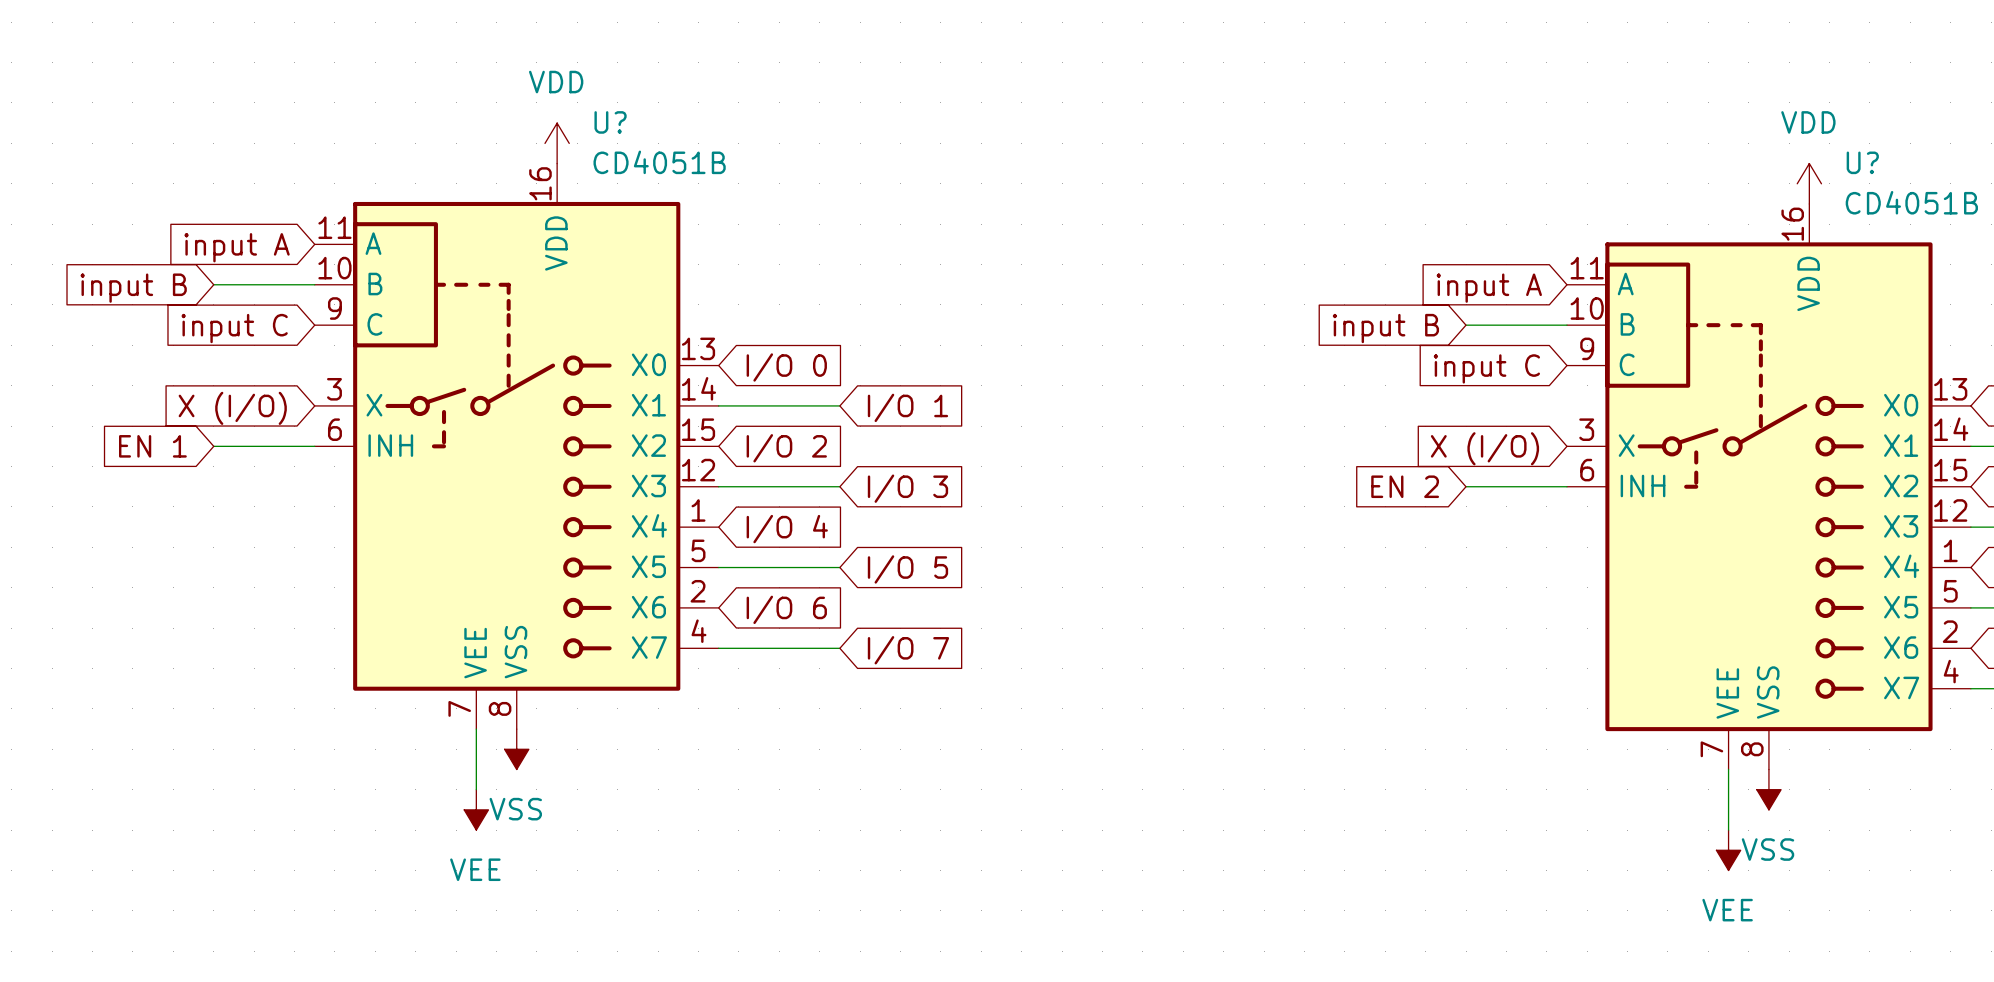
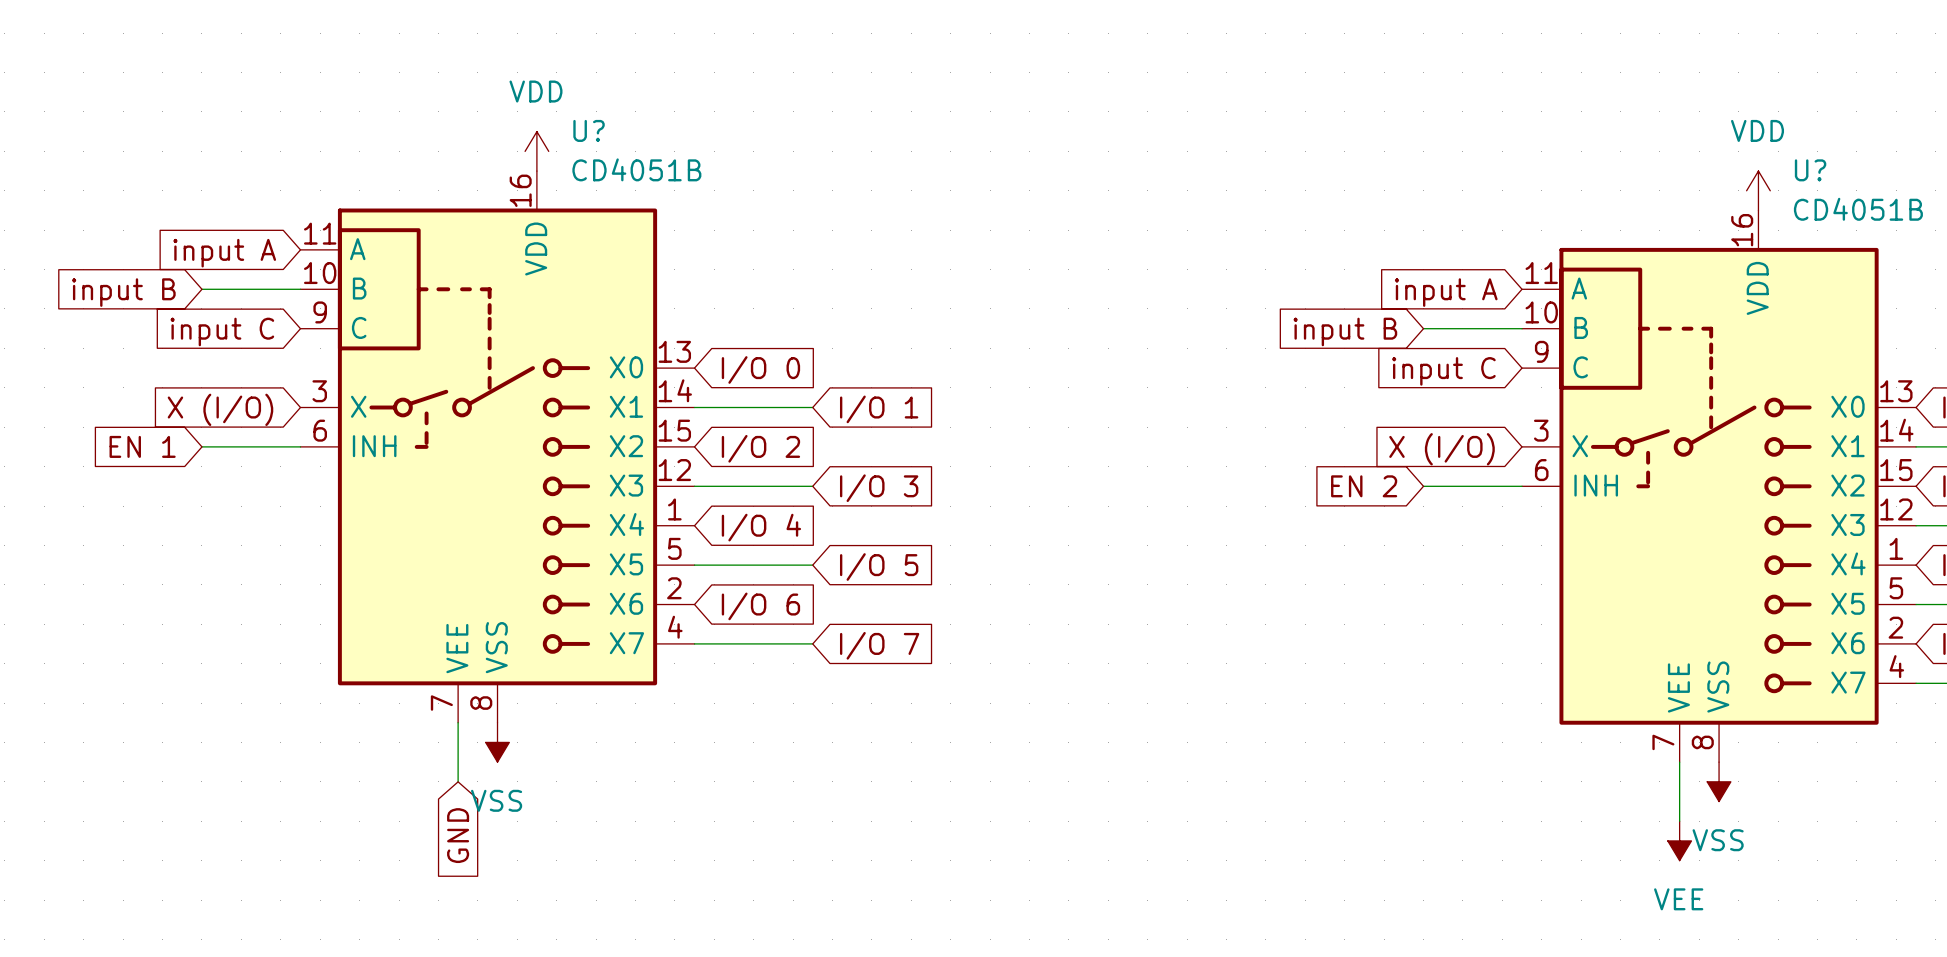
power symbol: VEE (476, 809) -> none
global label: none -> GND (458, 835)

